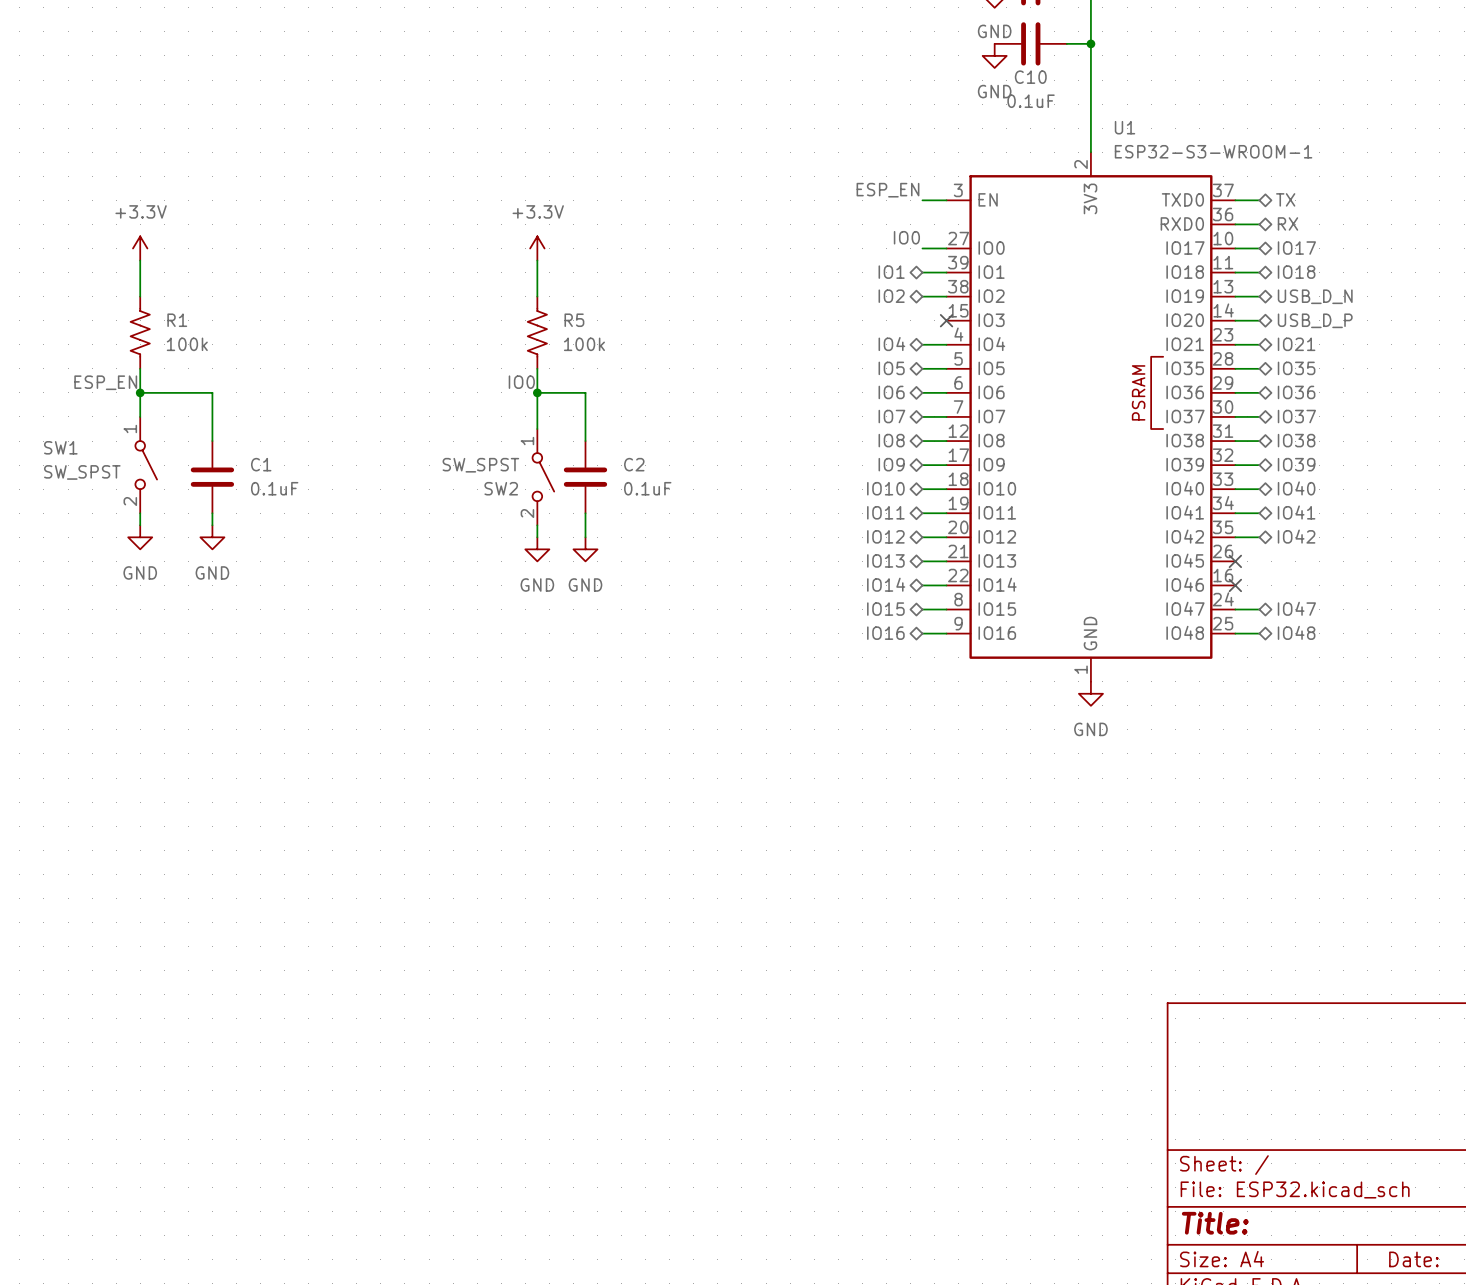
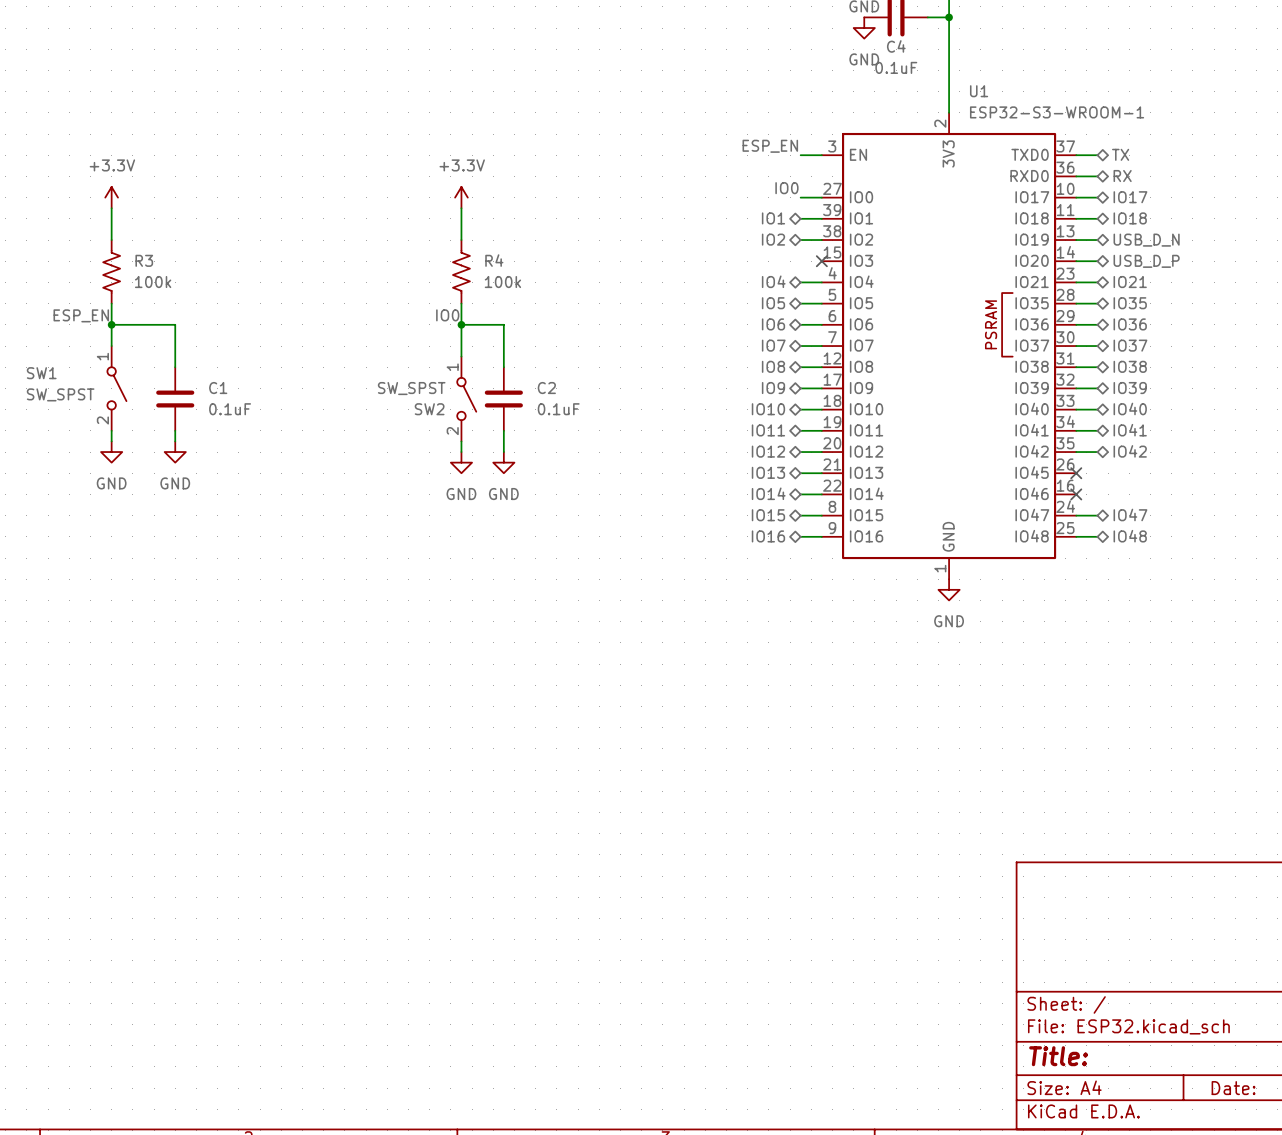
C10 name: C10 (1030, 77) -> C4 (896, 46)
R1 name: R1 (177, 320) -> R3 (144, 260)
R5 name: R5 (574, 320) -> R4 (494, 260)

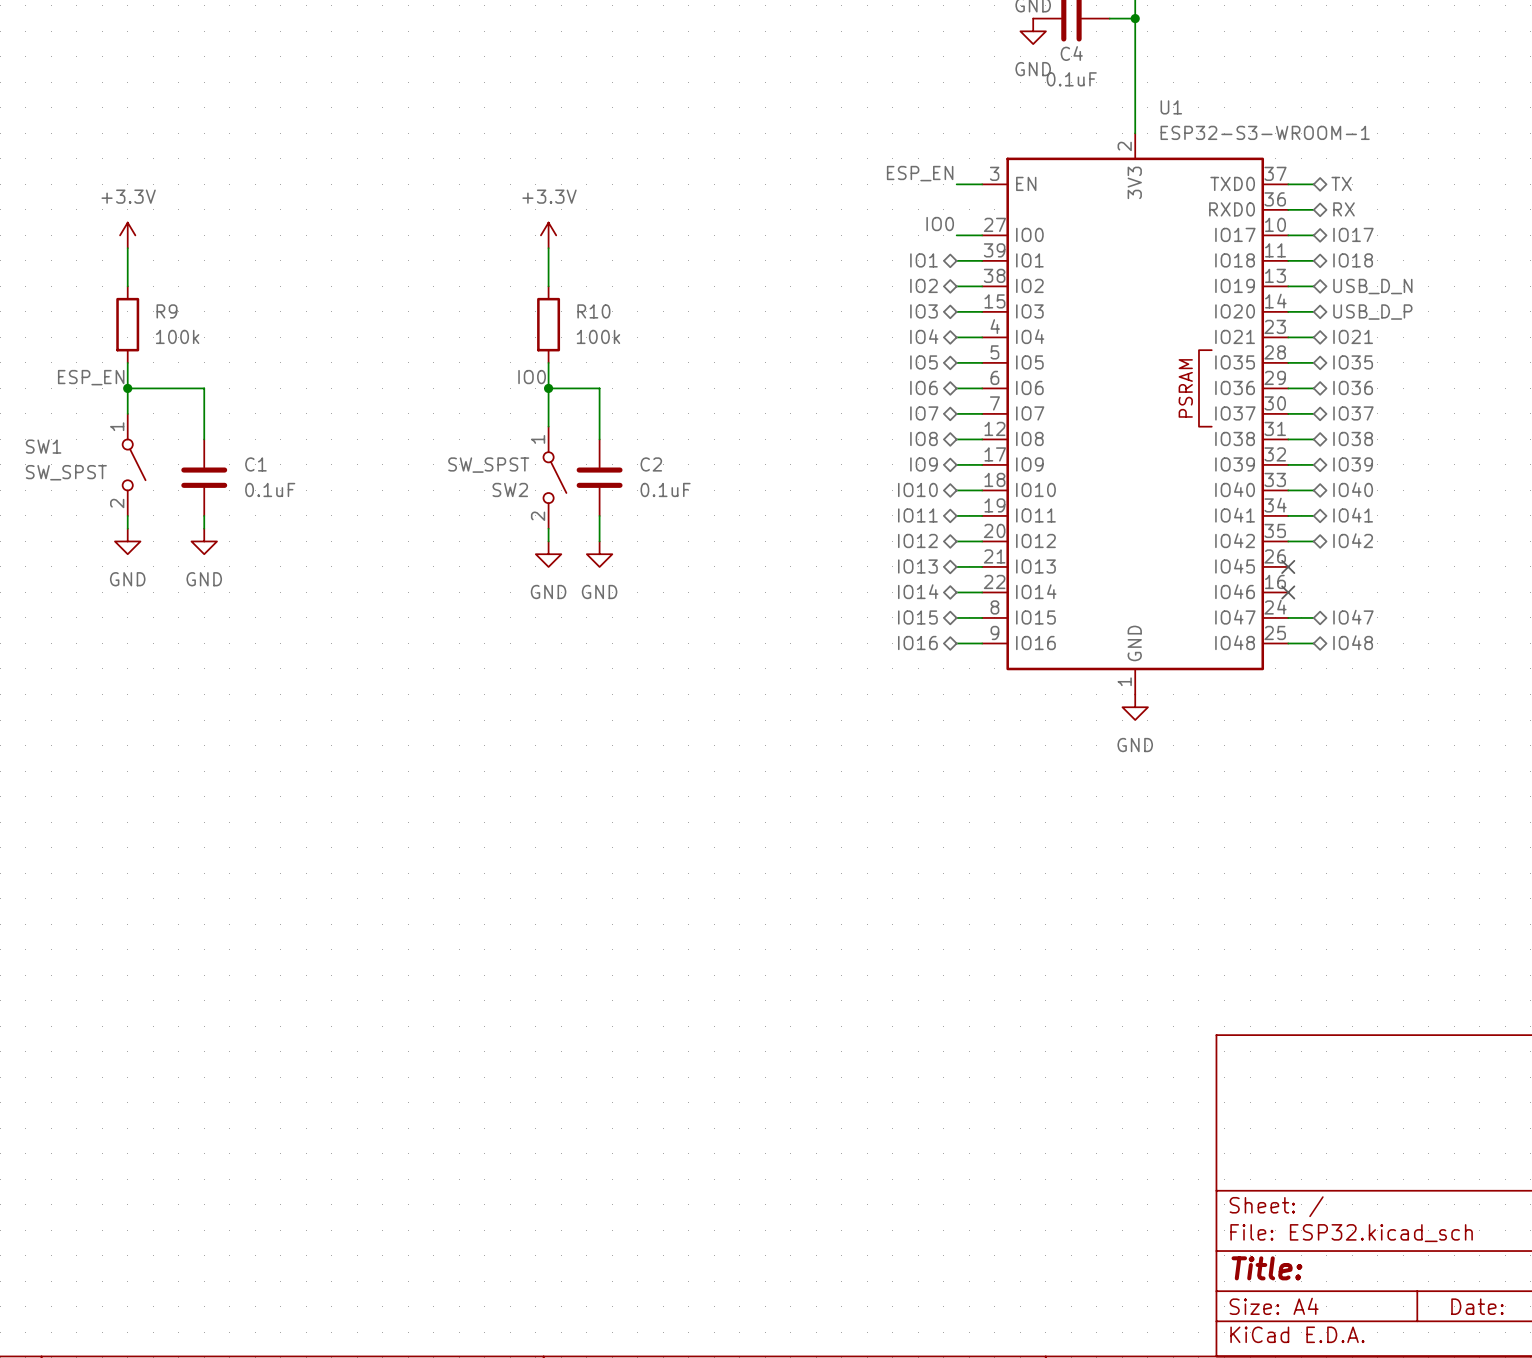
hierarchical label: none -> IO3 (923, 311)
wire: none -> (956, 311) (982, 311)
no-connect mark: (821, 261) -> none
R3: 100k (111, 271) -> none
R9: none -> 100k (127, 324)
R4: 100k (461, 271) -> none
R10: none -> 100k (548, 324)

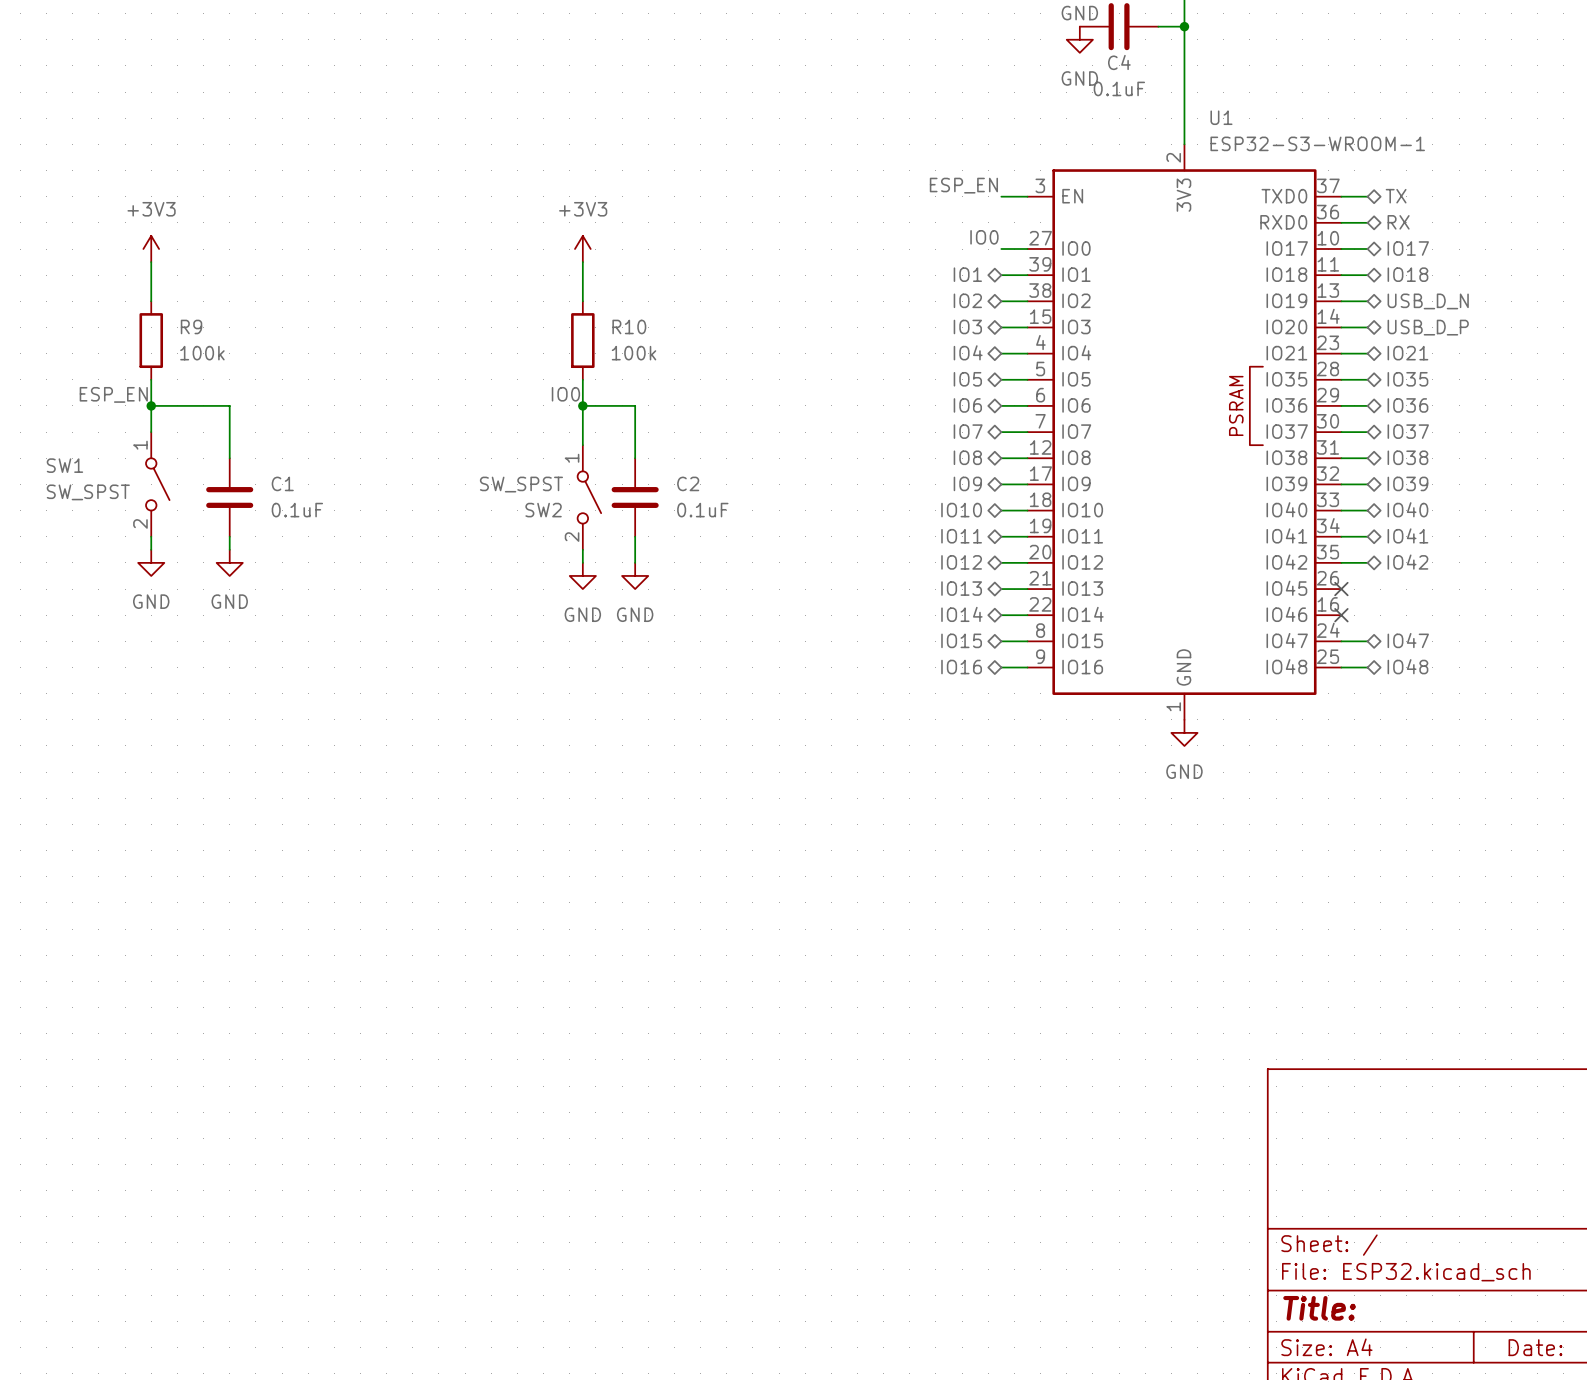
power symbol: +3.3V (127, 235) -> +3V3 (151, 249)
power symbol: +3.3V (548, 235) -> +3V3 (582, 249)

